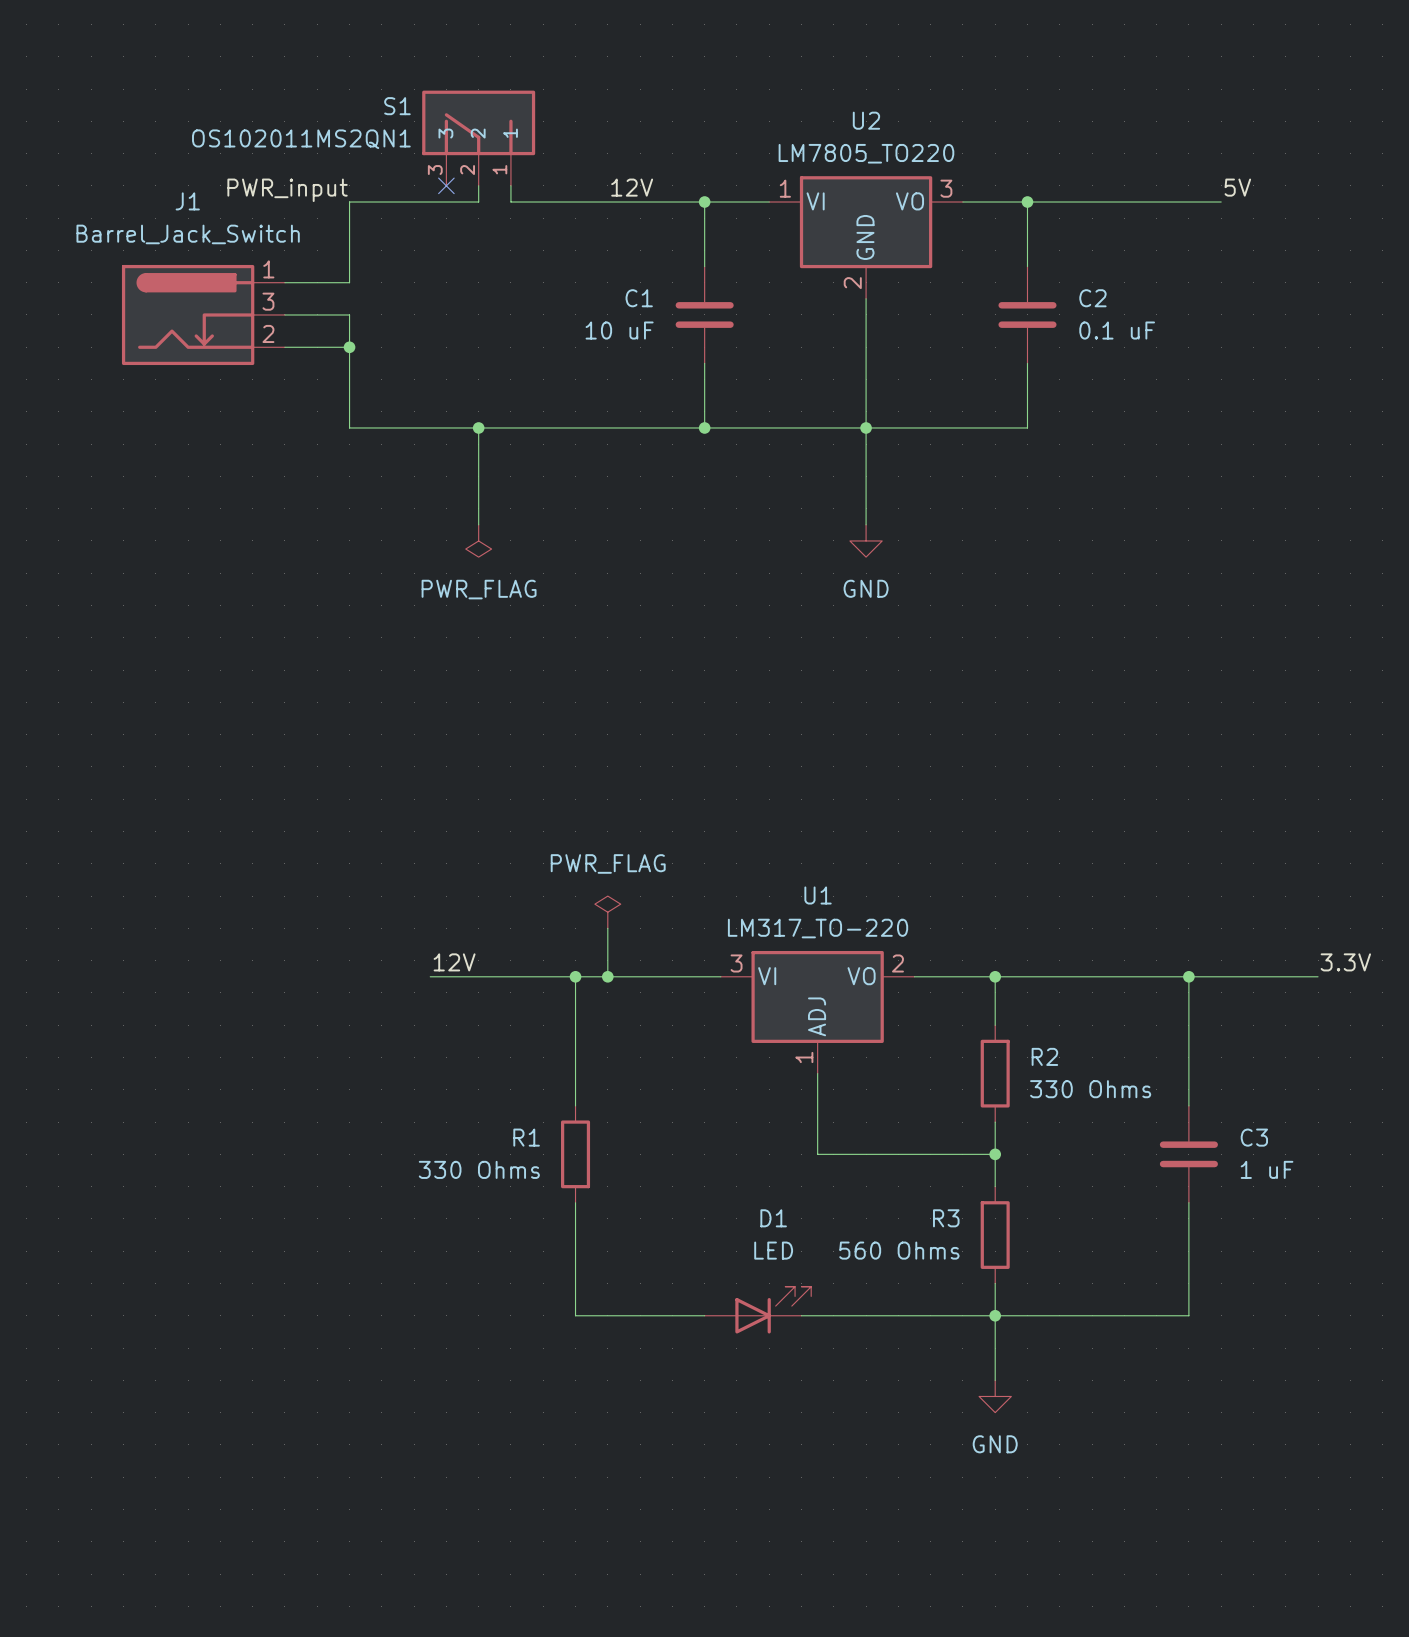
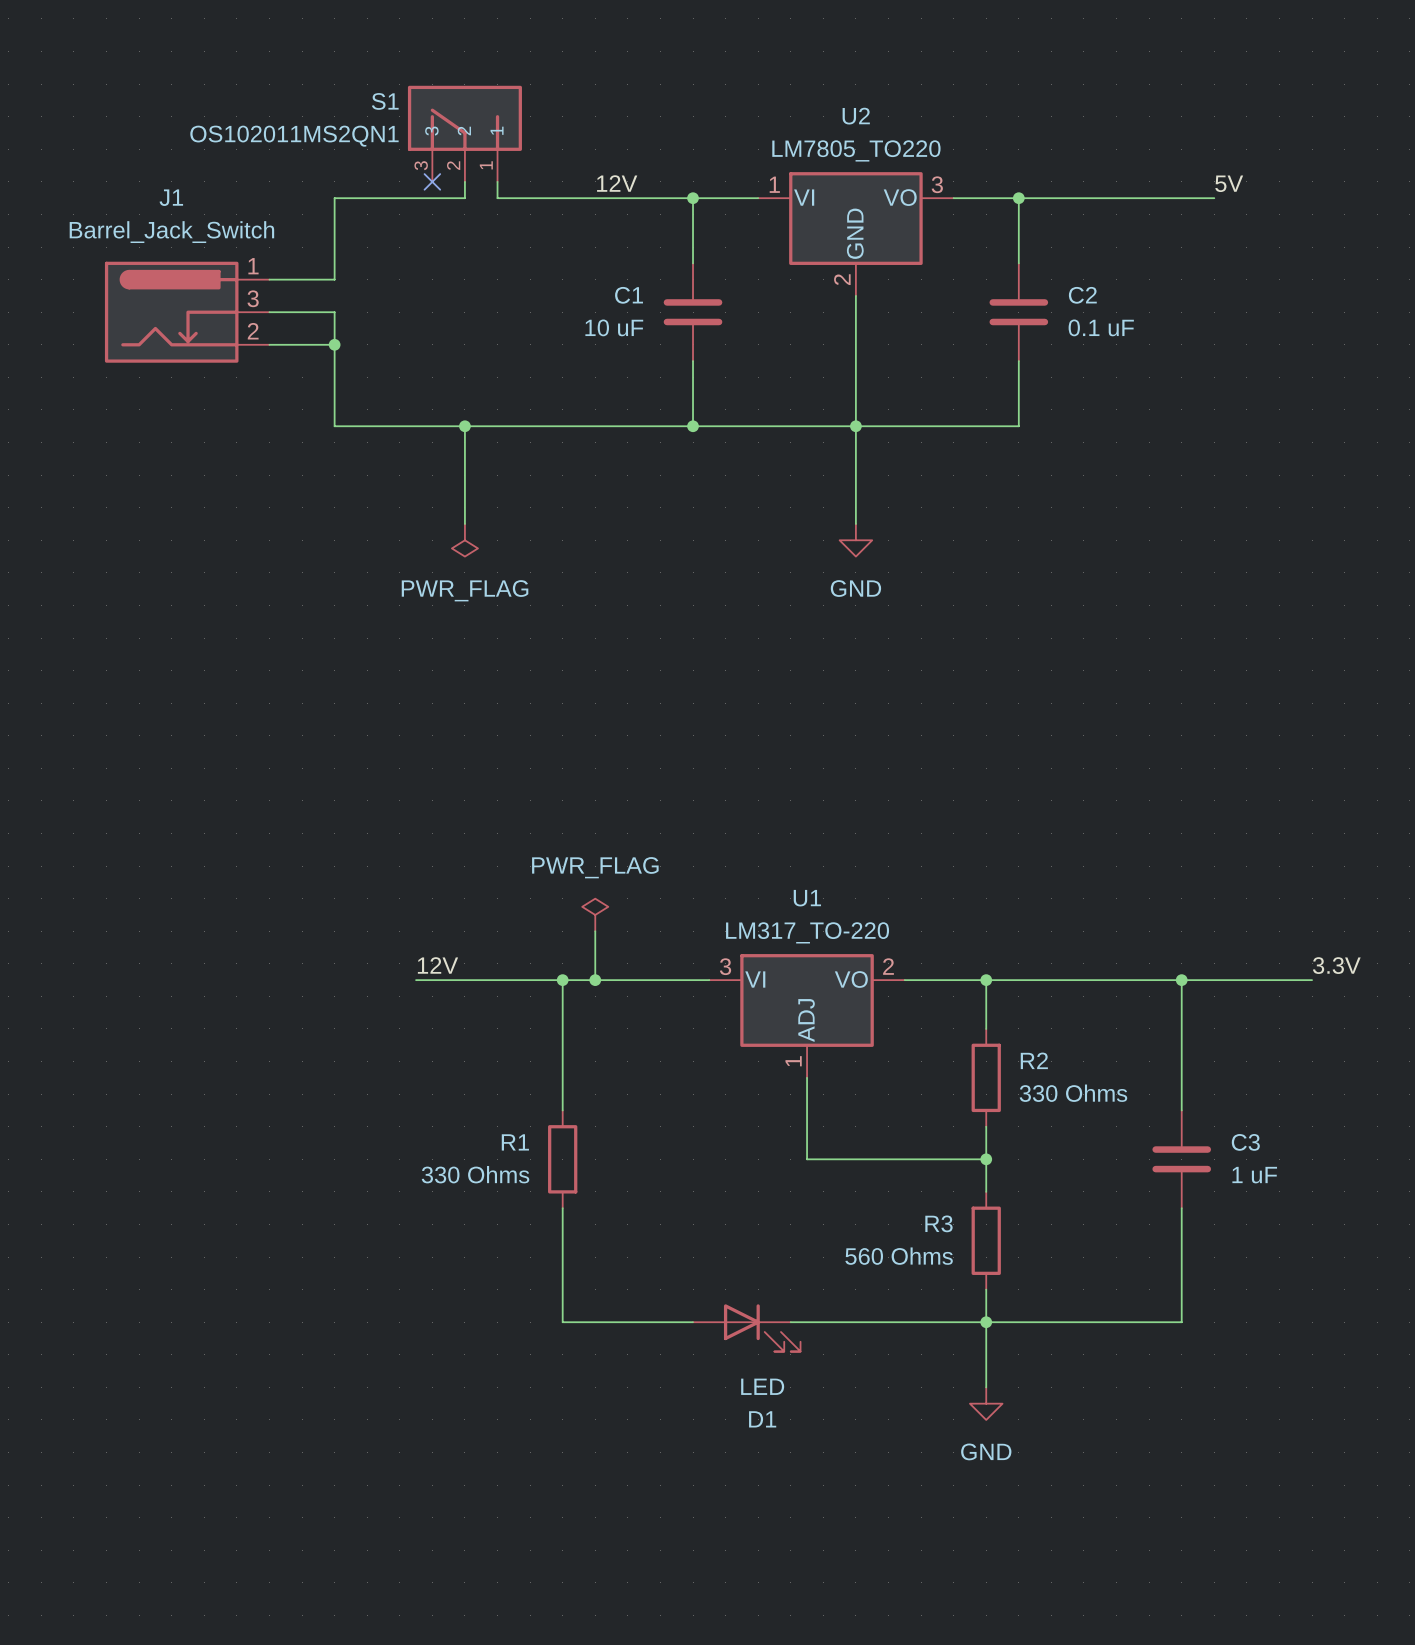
label: PWR_input (287, 190) -> none
D1 flip: as is (773, 1310) -> up-down (762, 1327)

